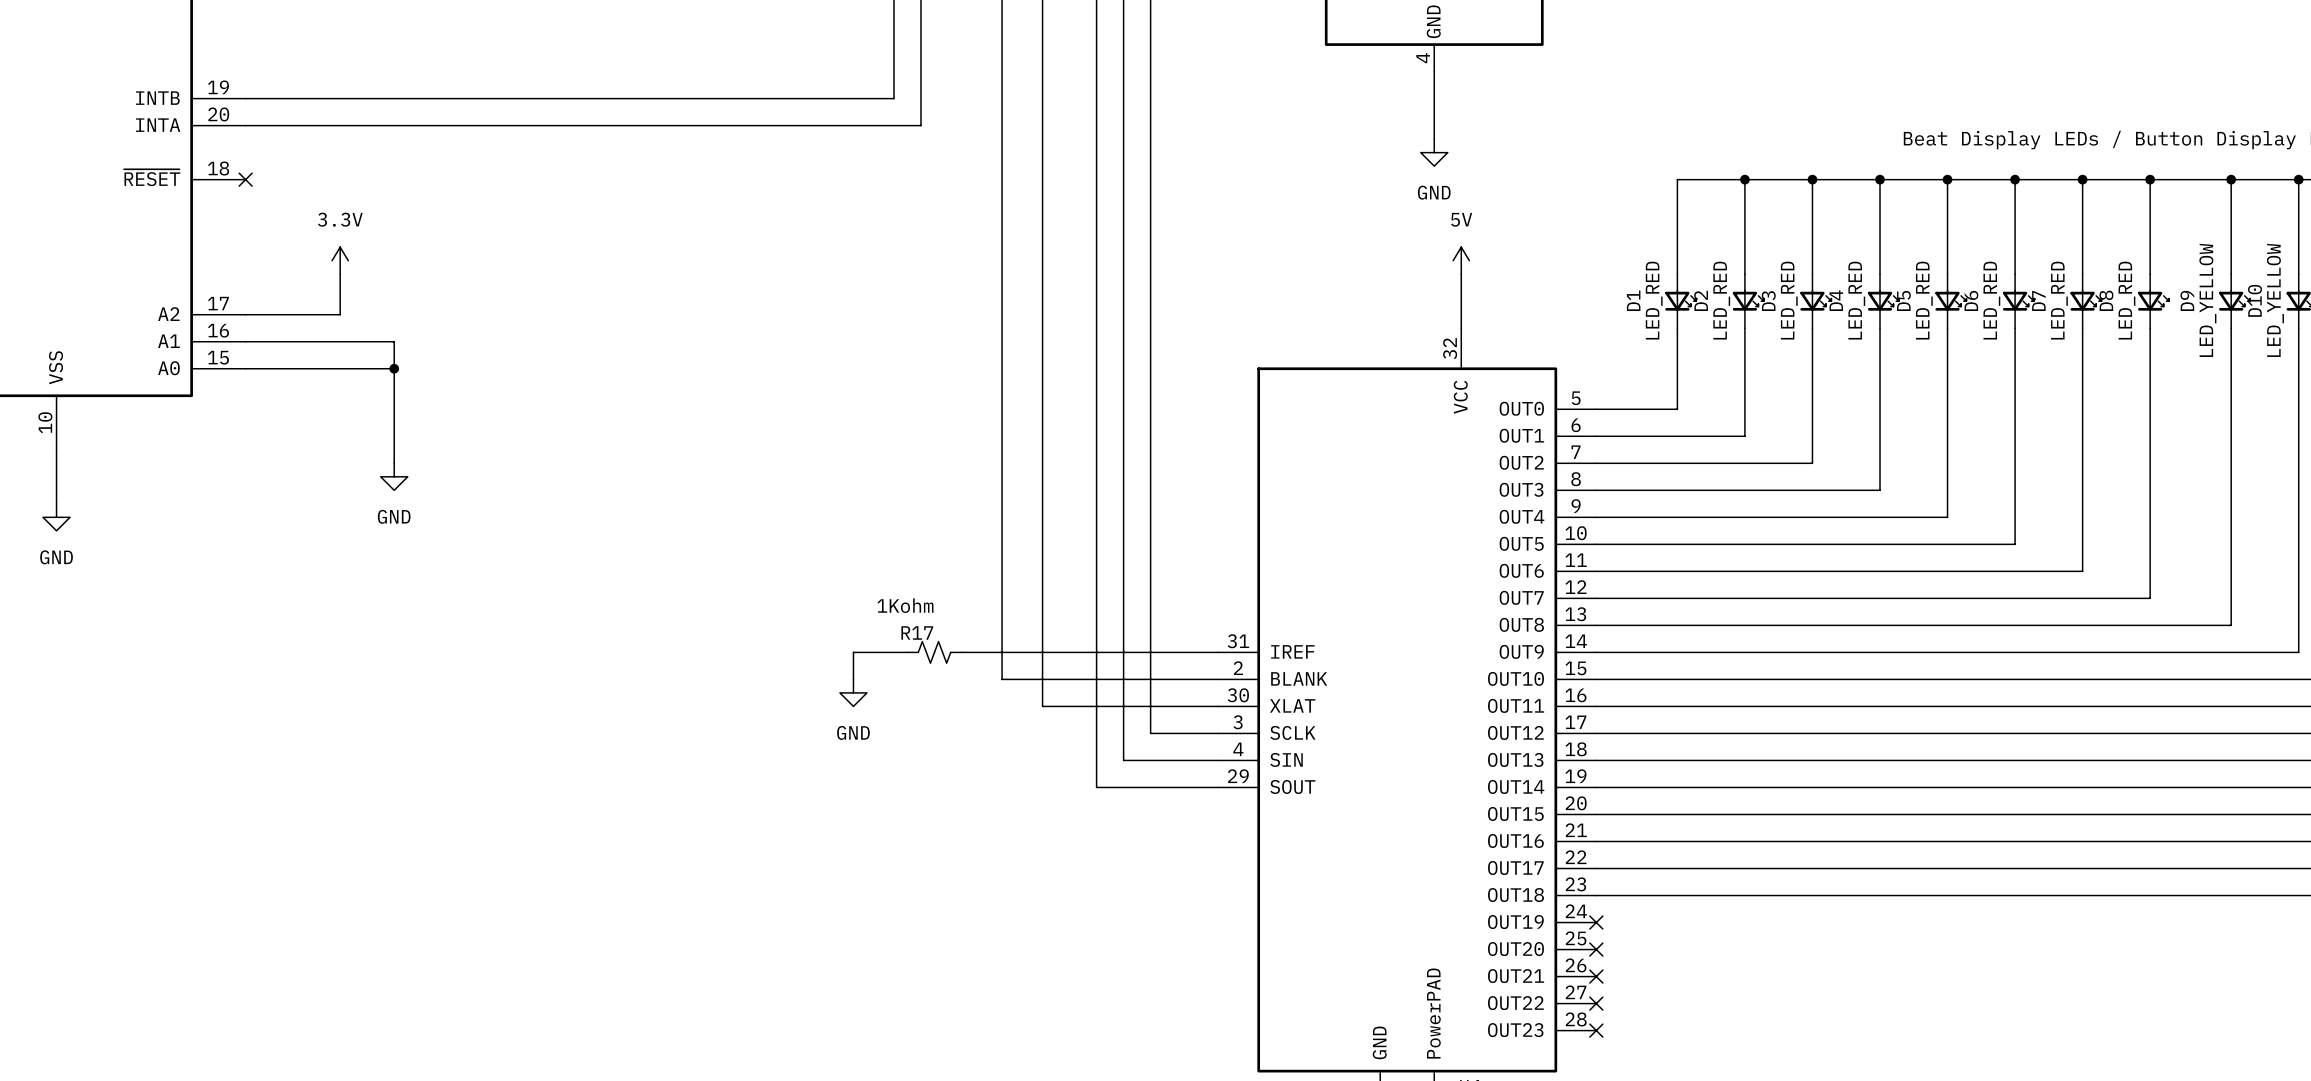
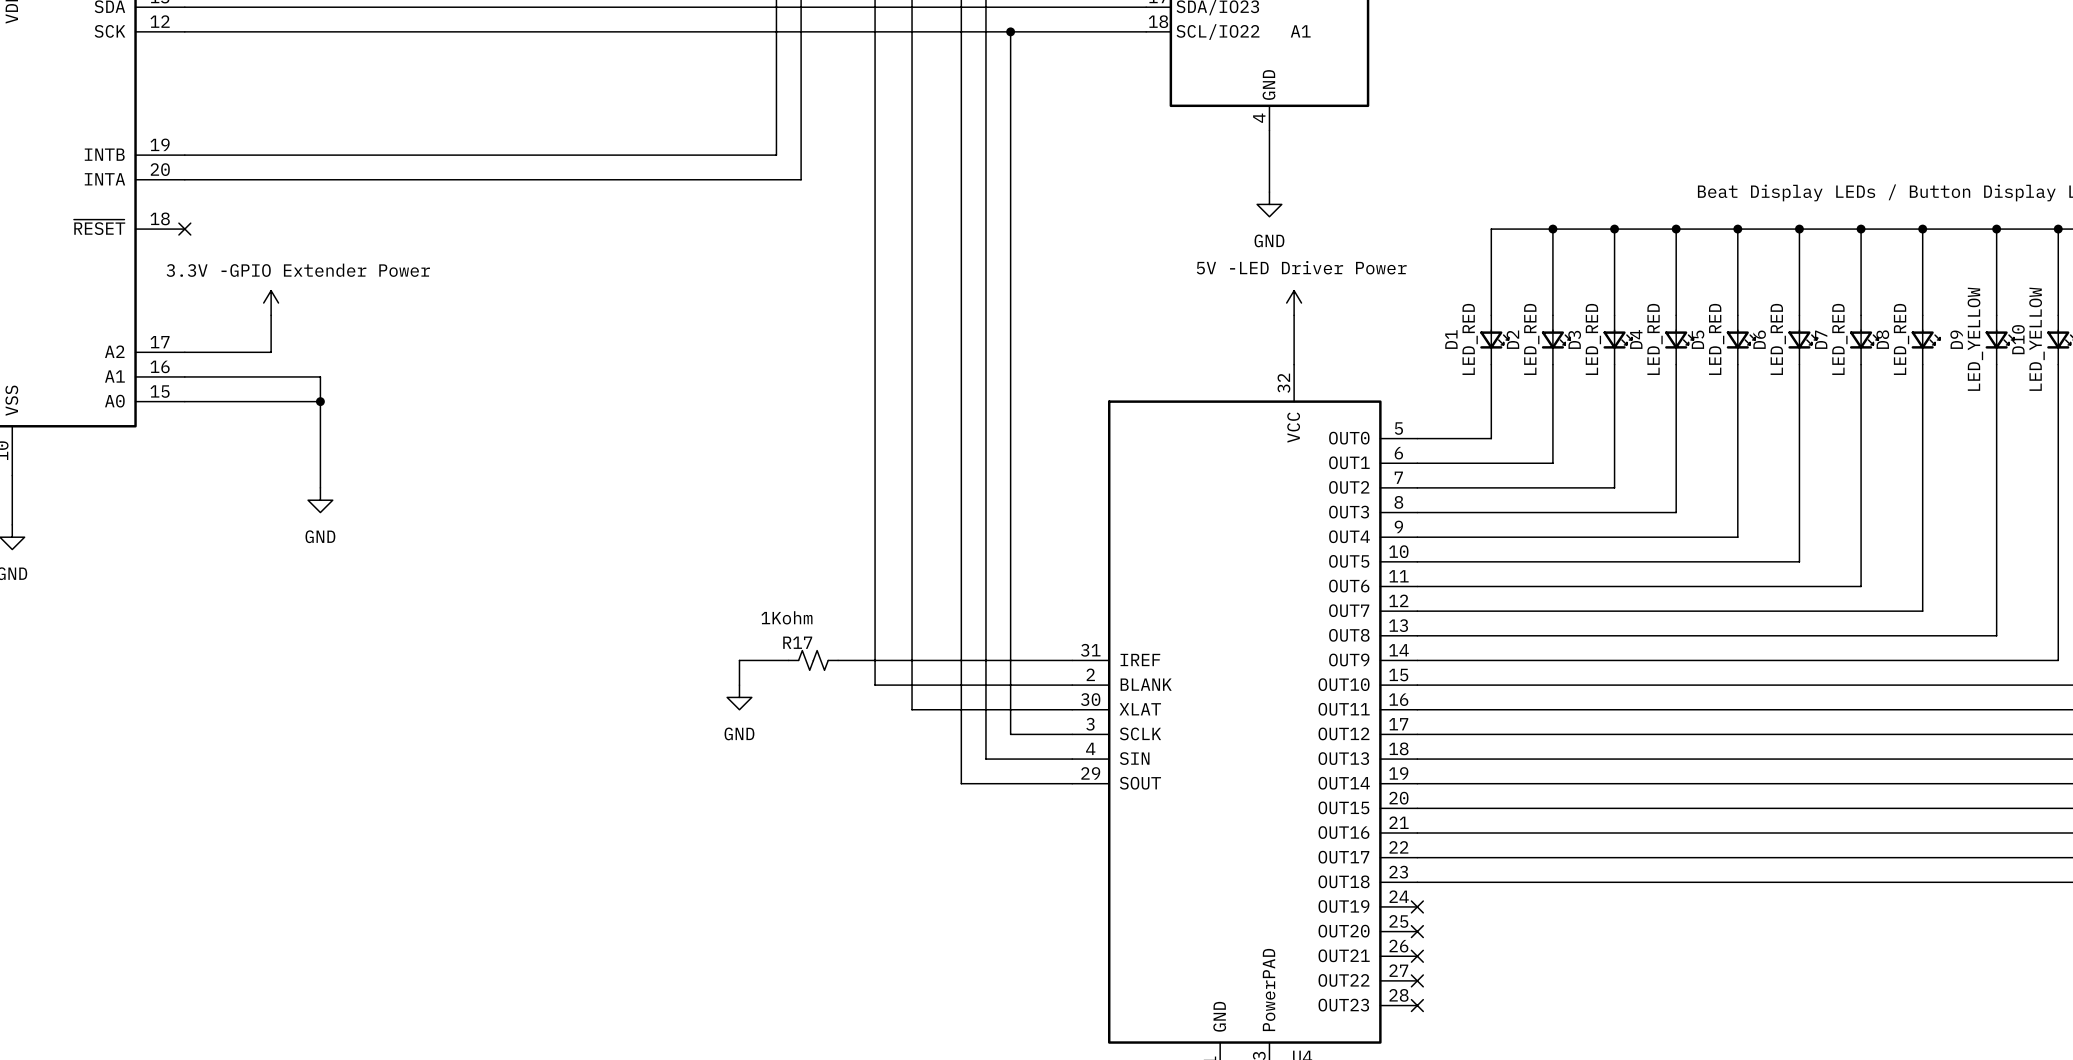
power symbol: 3.3V (340, 260) -> 3.3V -GPIO Extender Power (271, 303)
power symbol: 5V (1461, 260) -> 5V -LED Driver Power (1294, 303)

